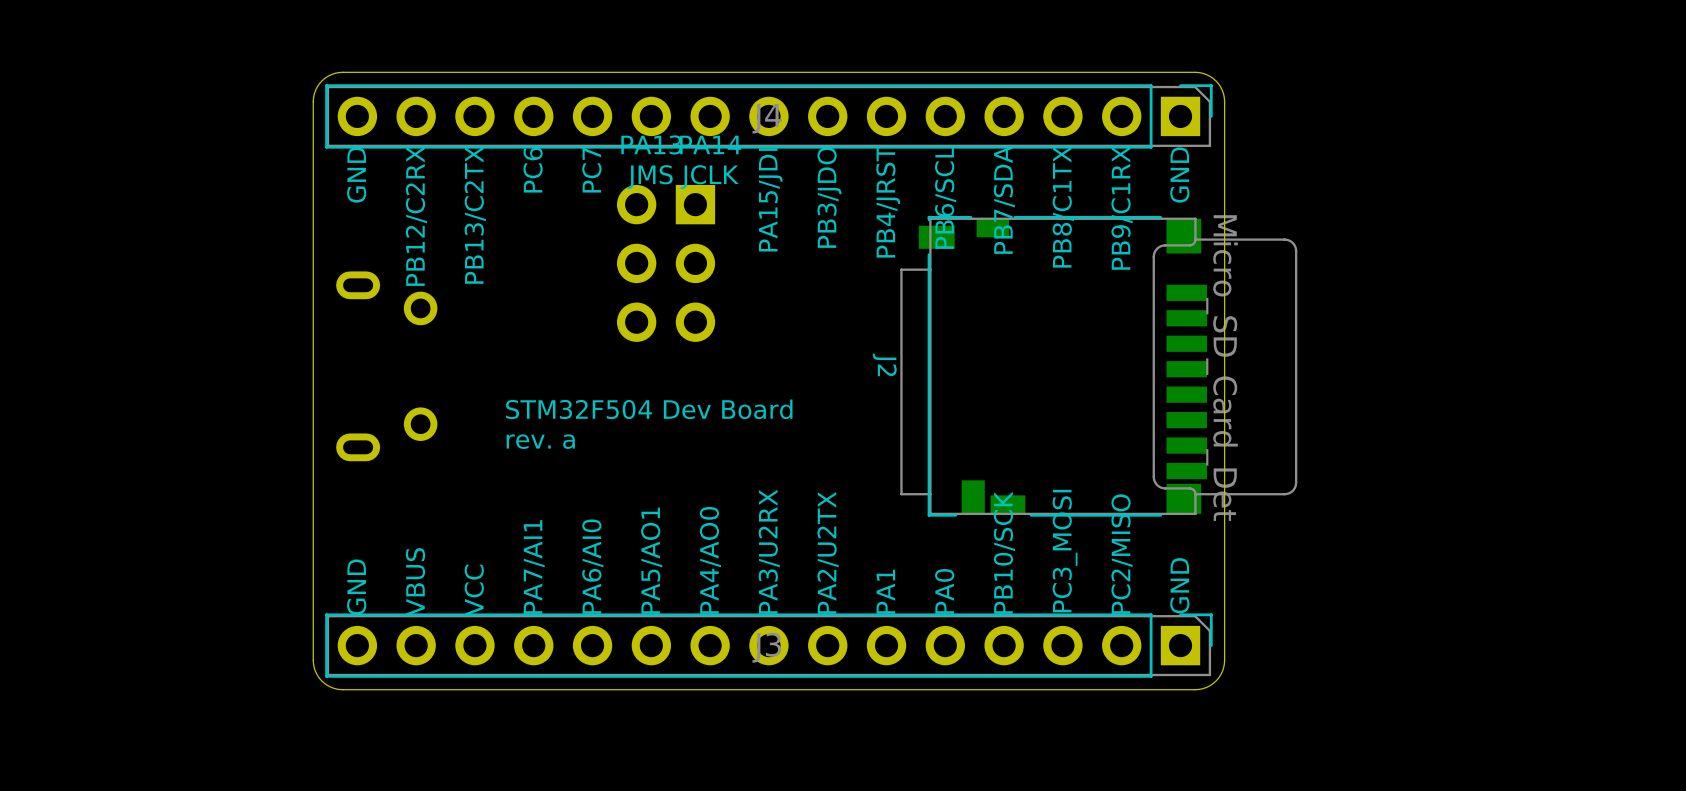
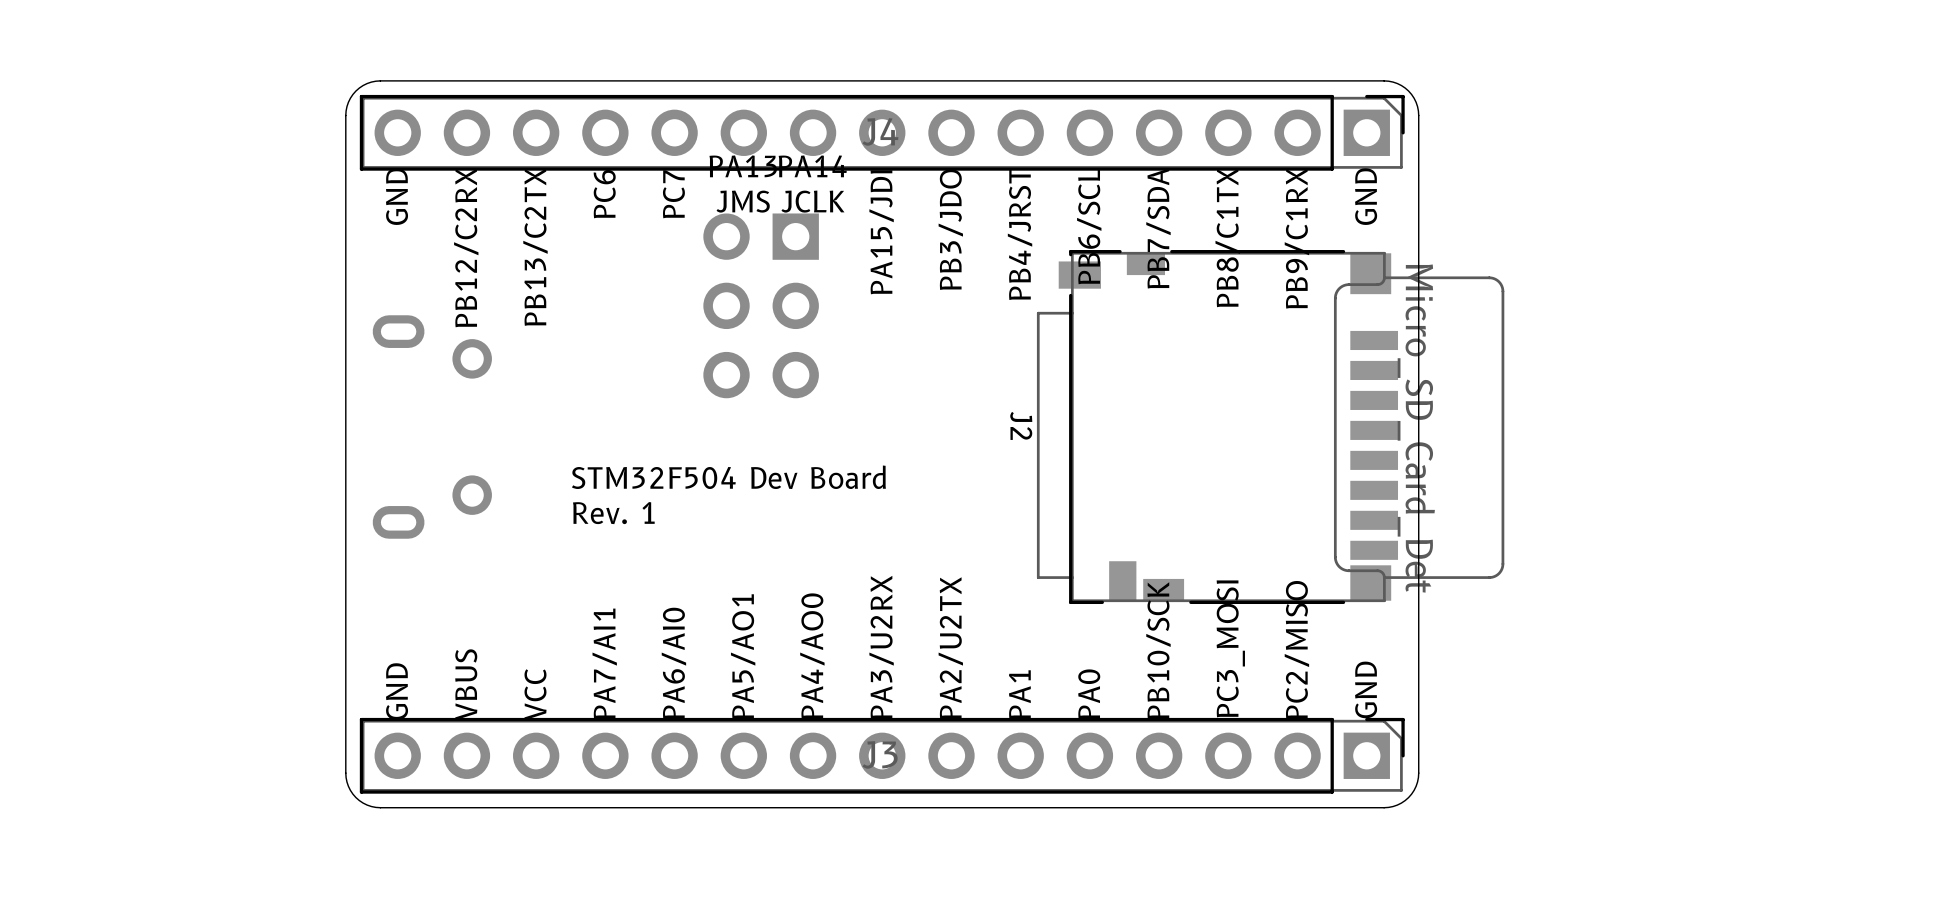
text: rev. a (540, 441) -> Rev. 1 (613, 513)

